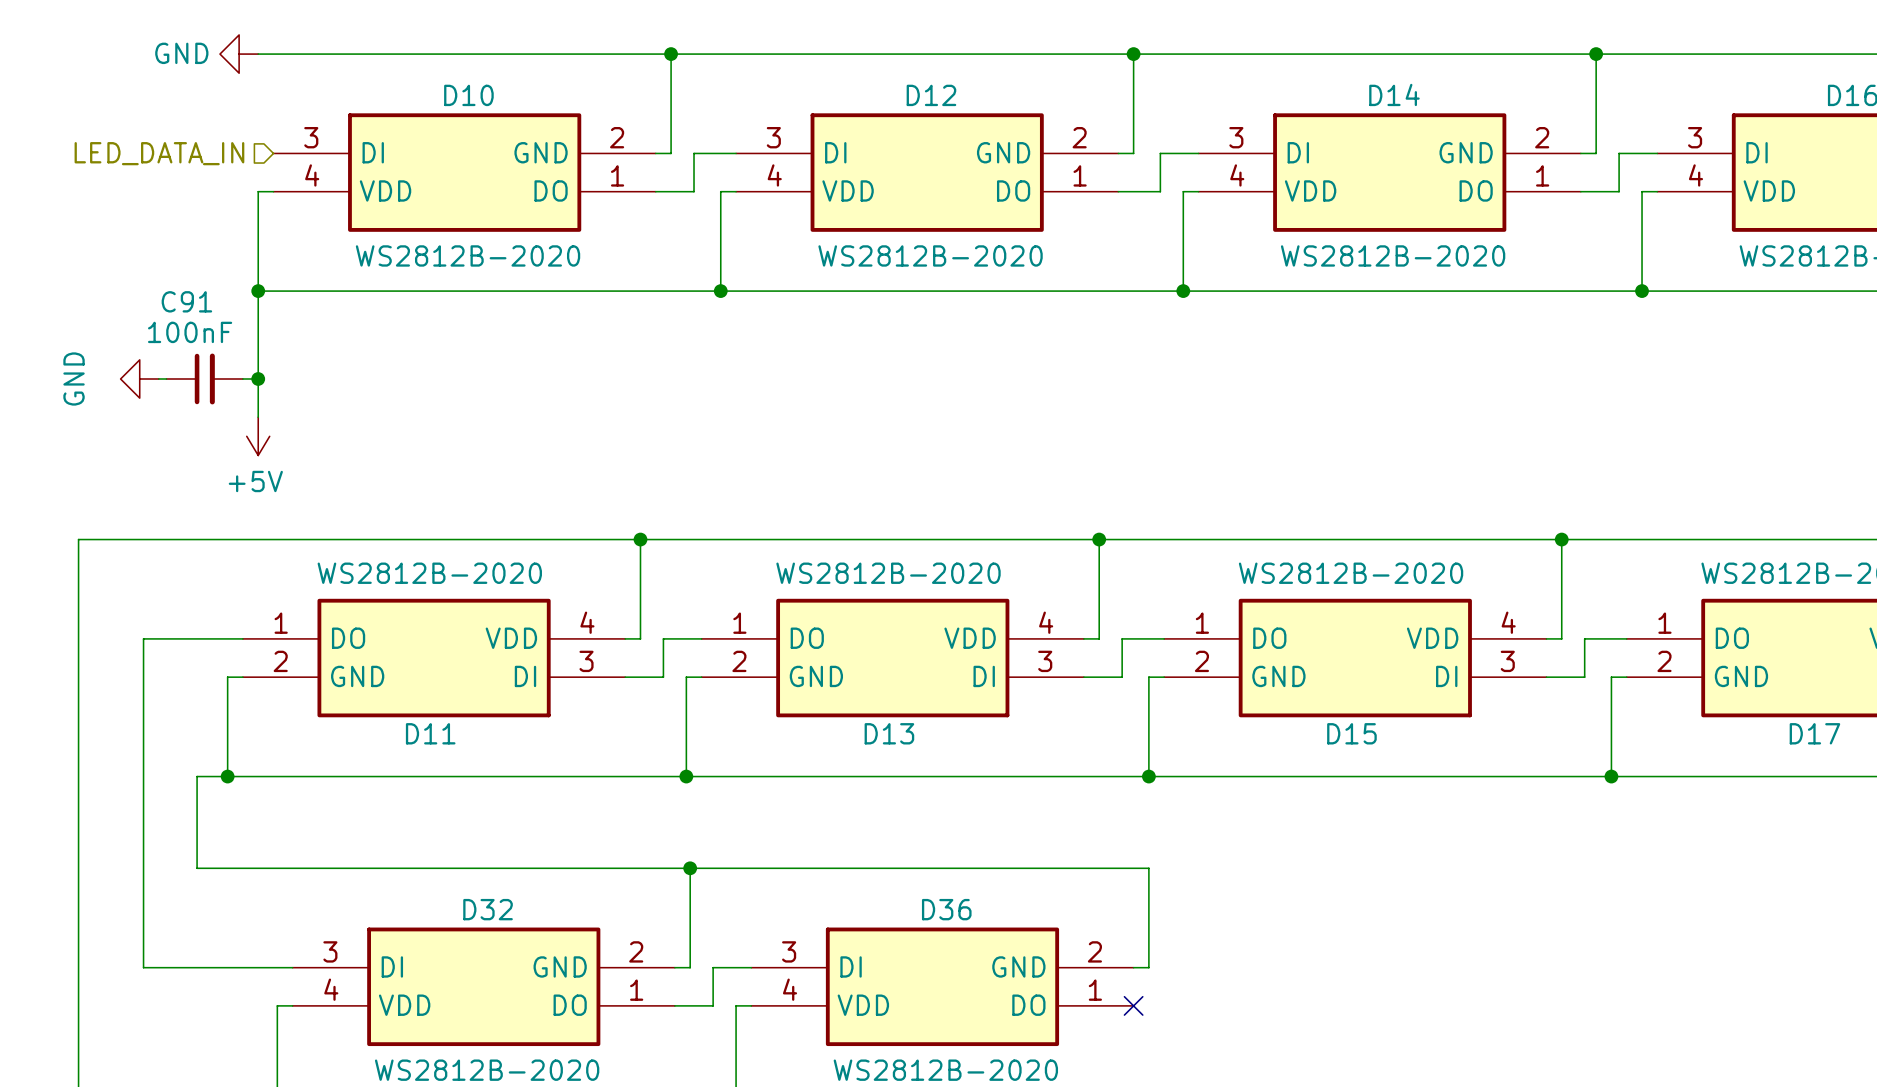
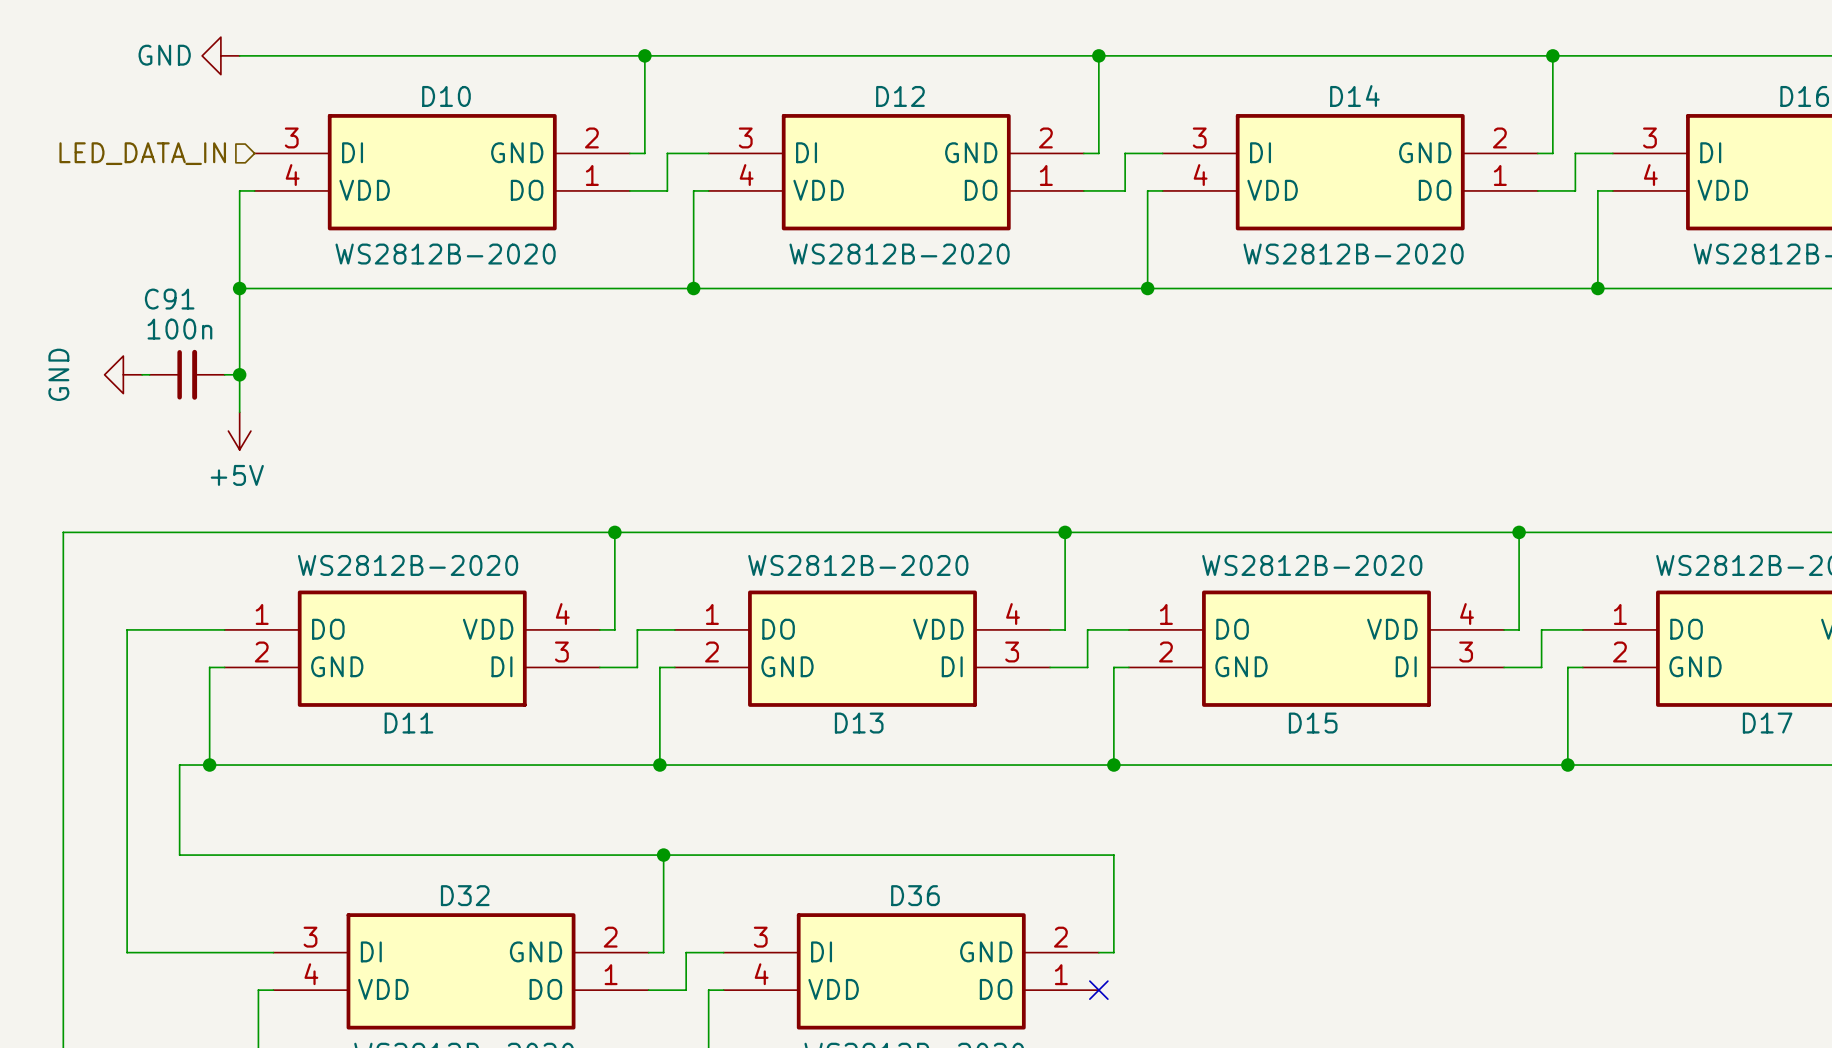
C91 value: 100nF (190, 332) -> 100n (179, 329)

